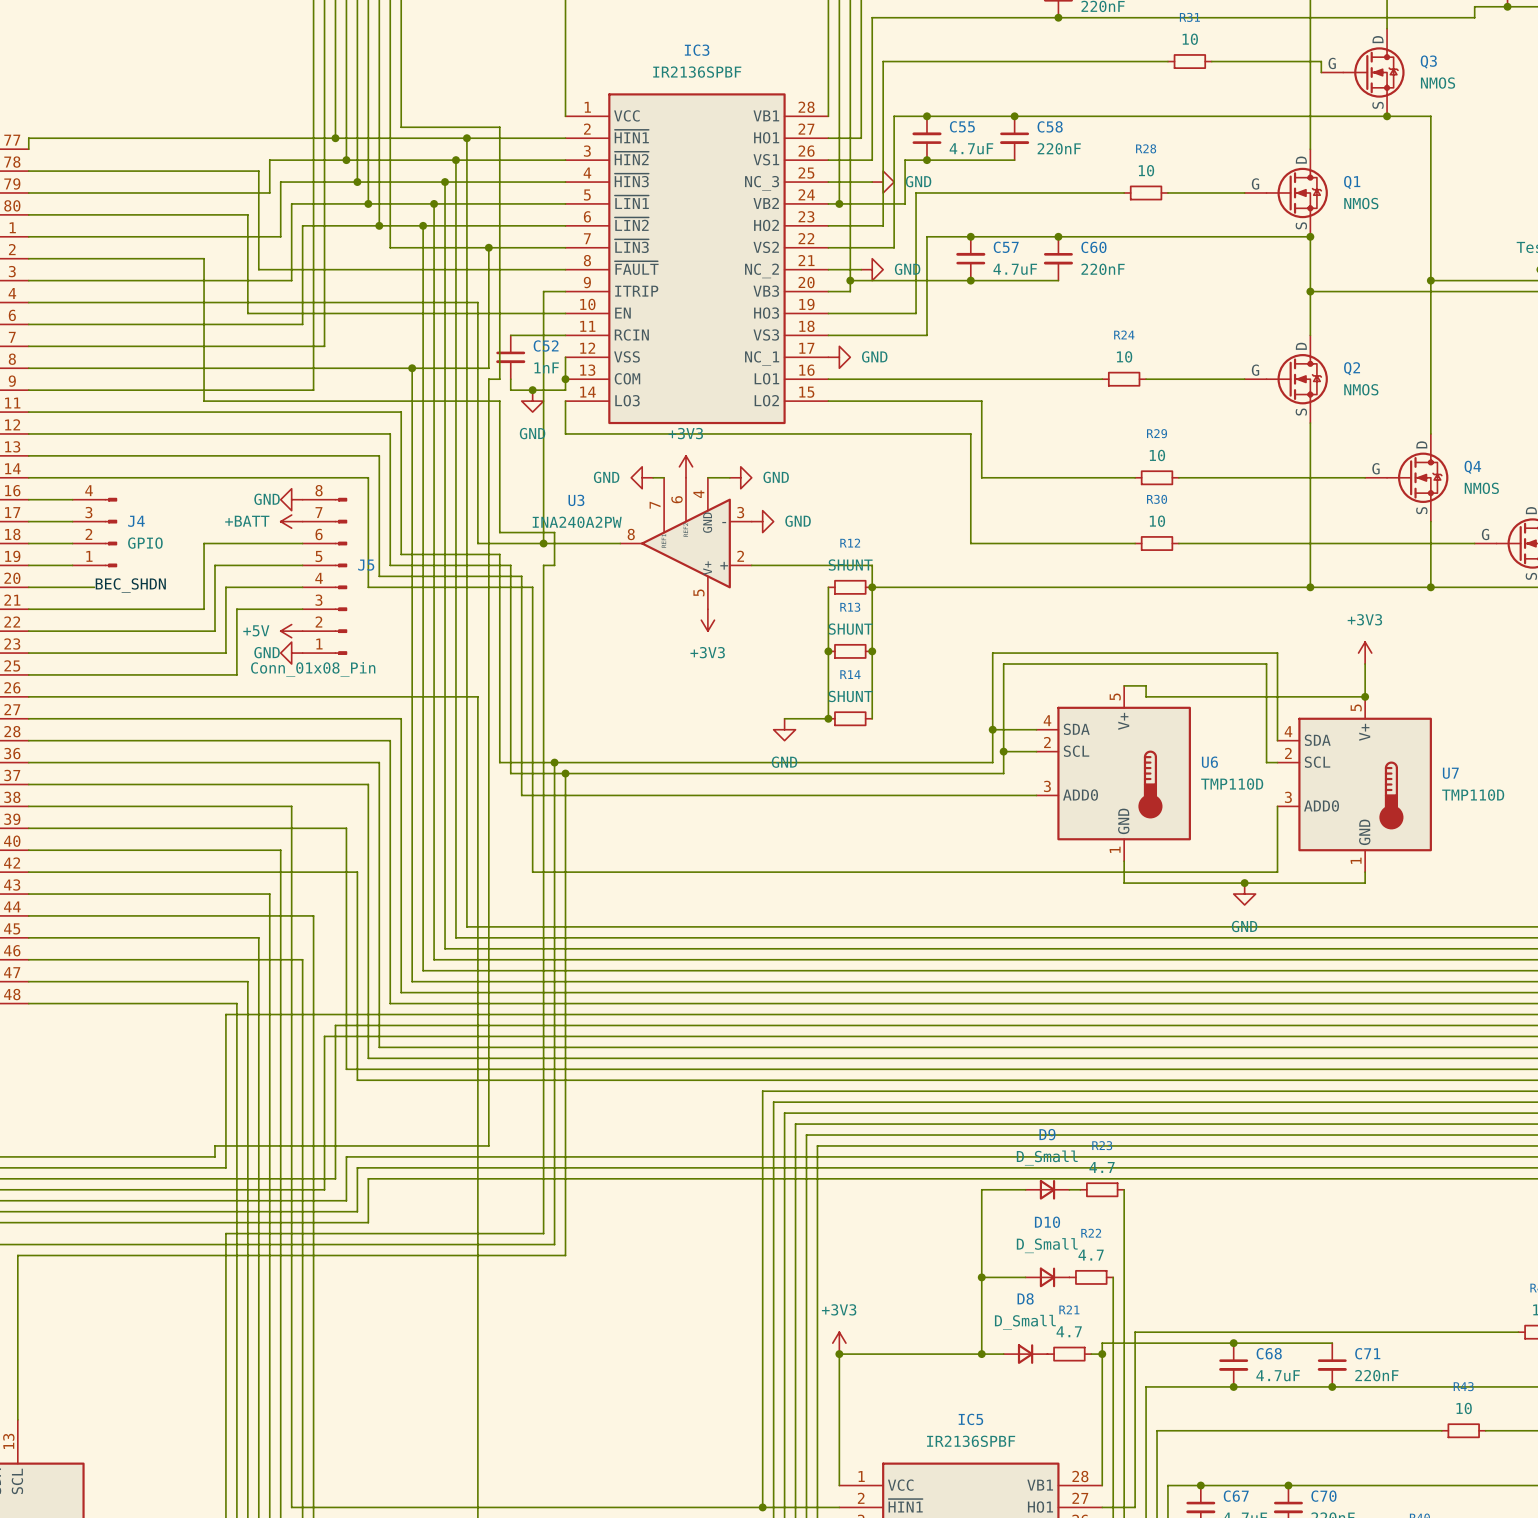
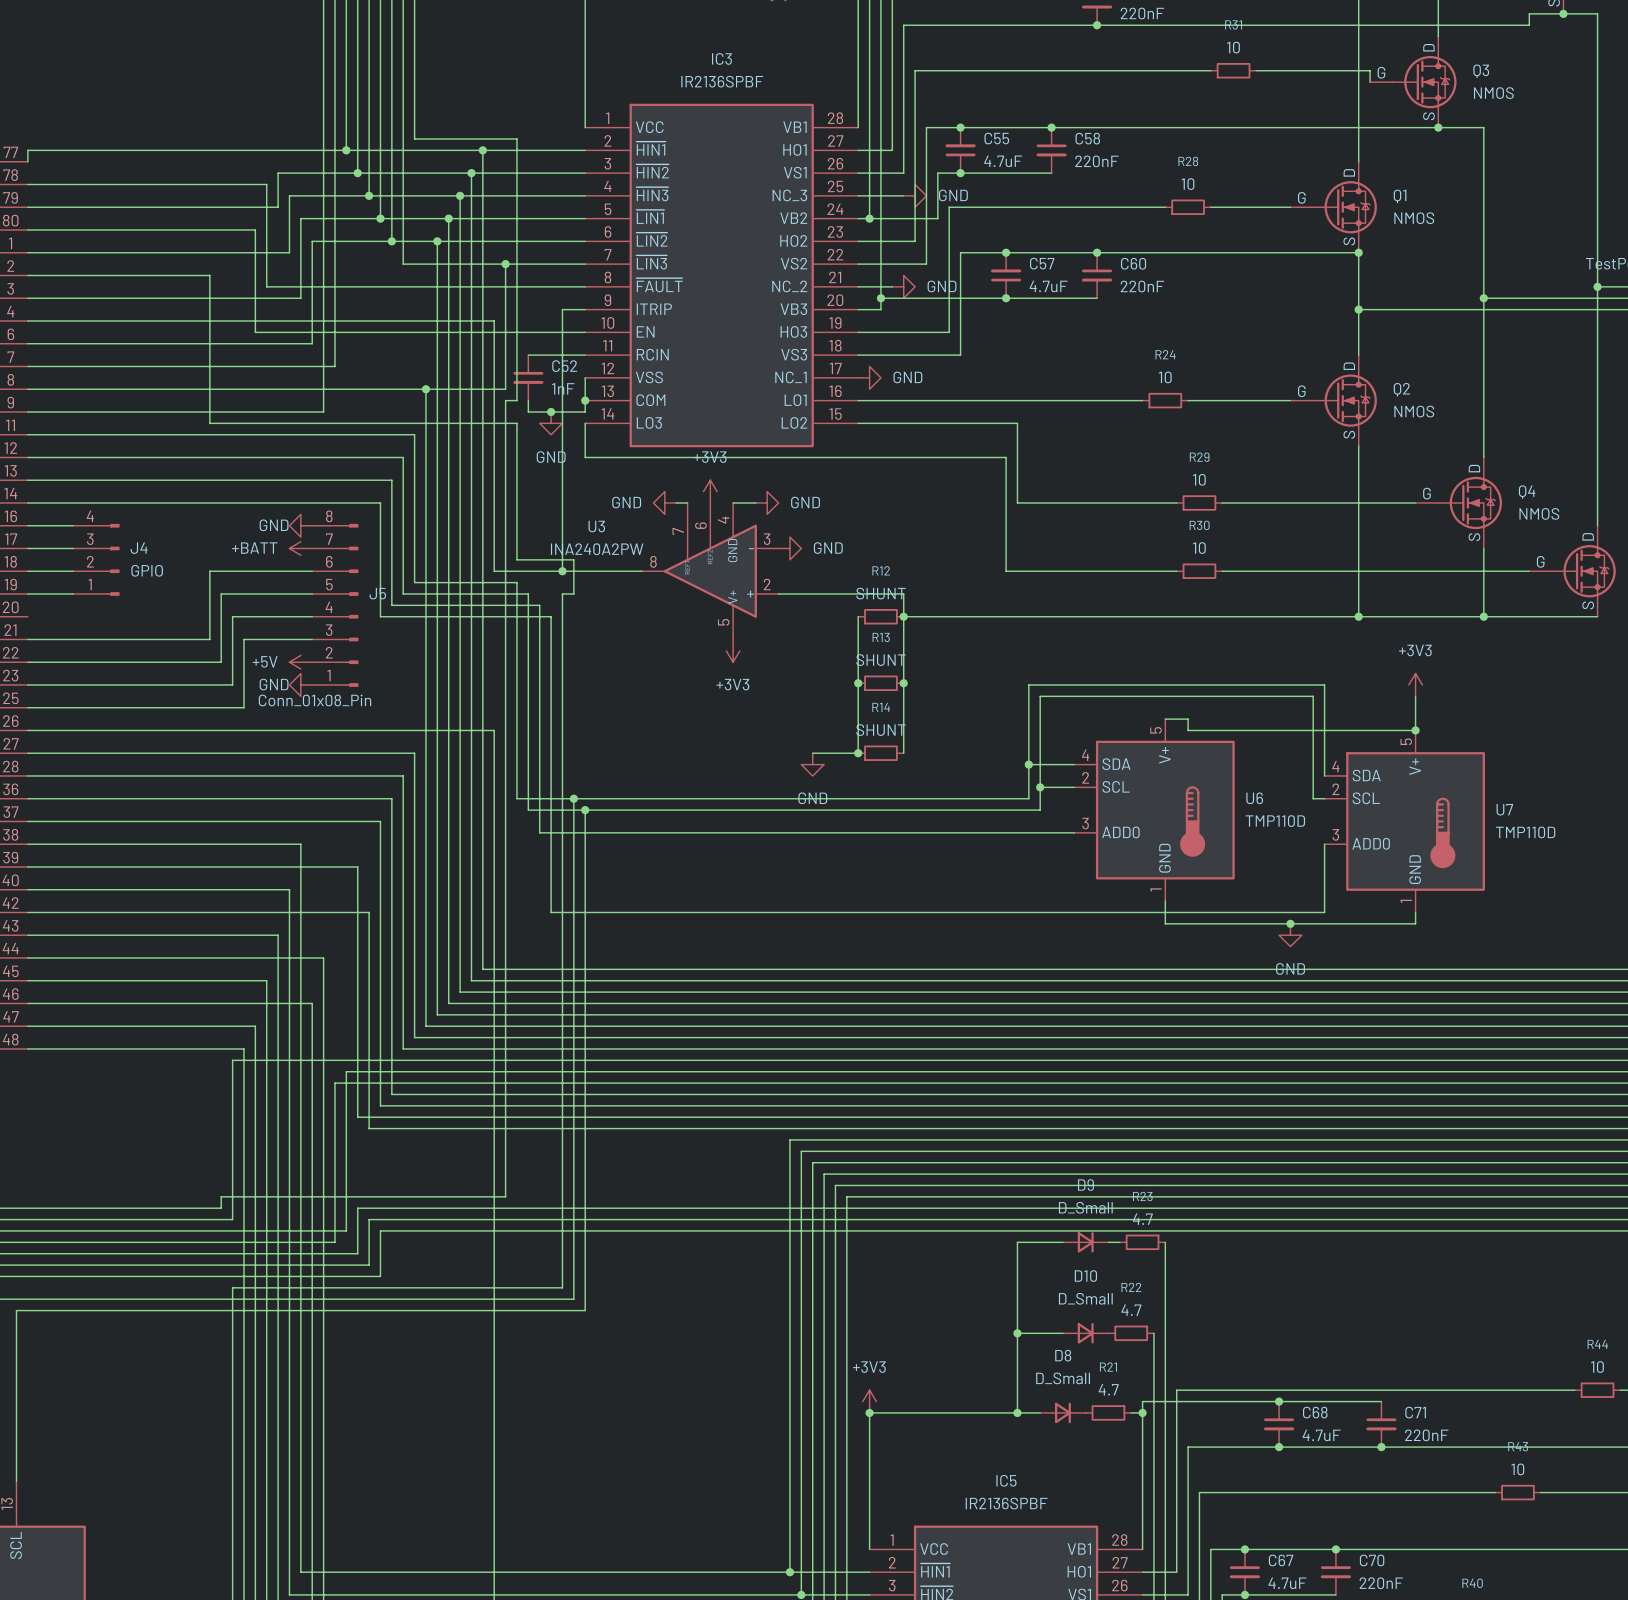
label: BEC_SHDN (130, 585) -> none
wire: (28, 587) (94, 587) -> none

